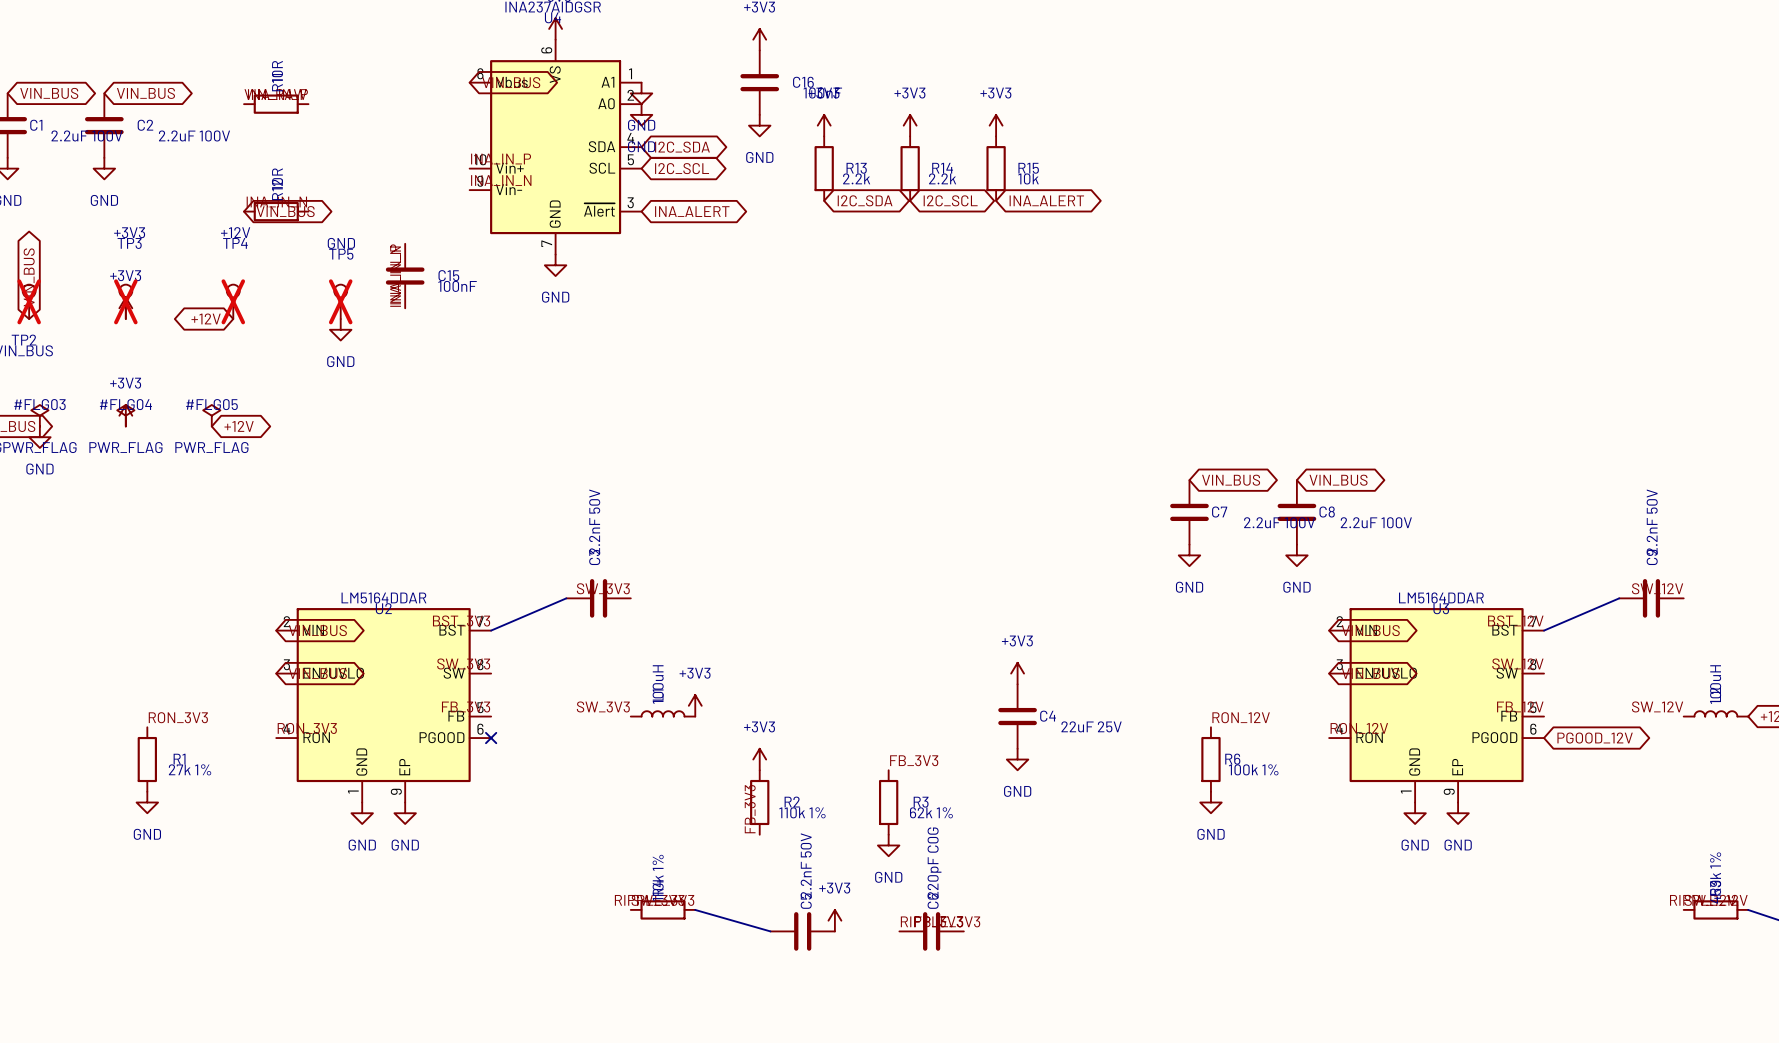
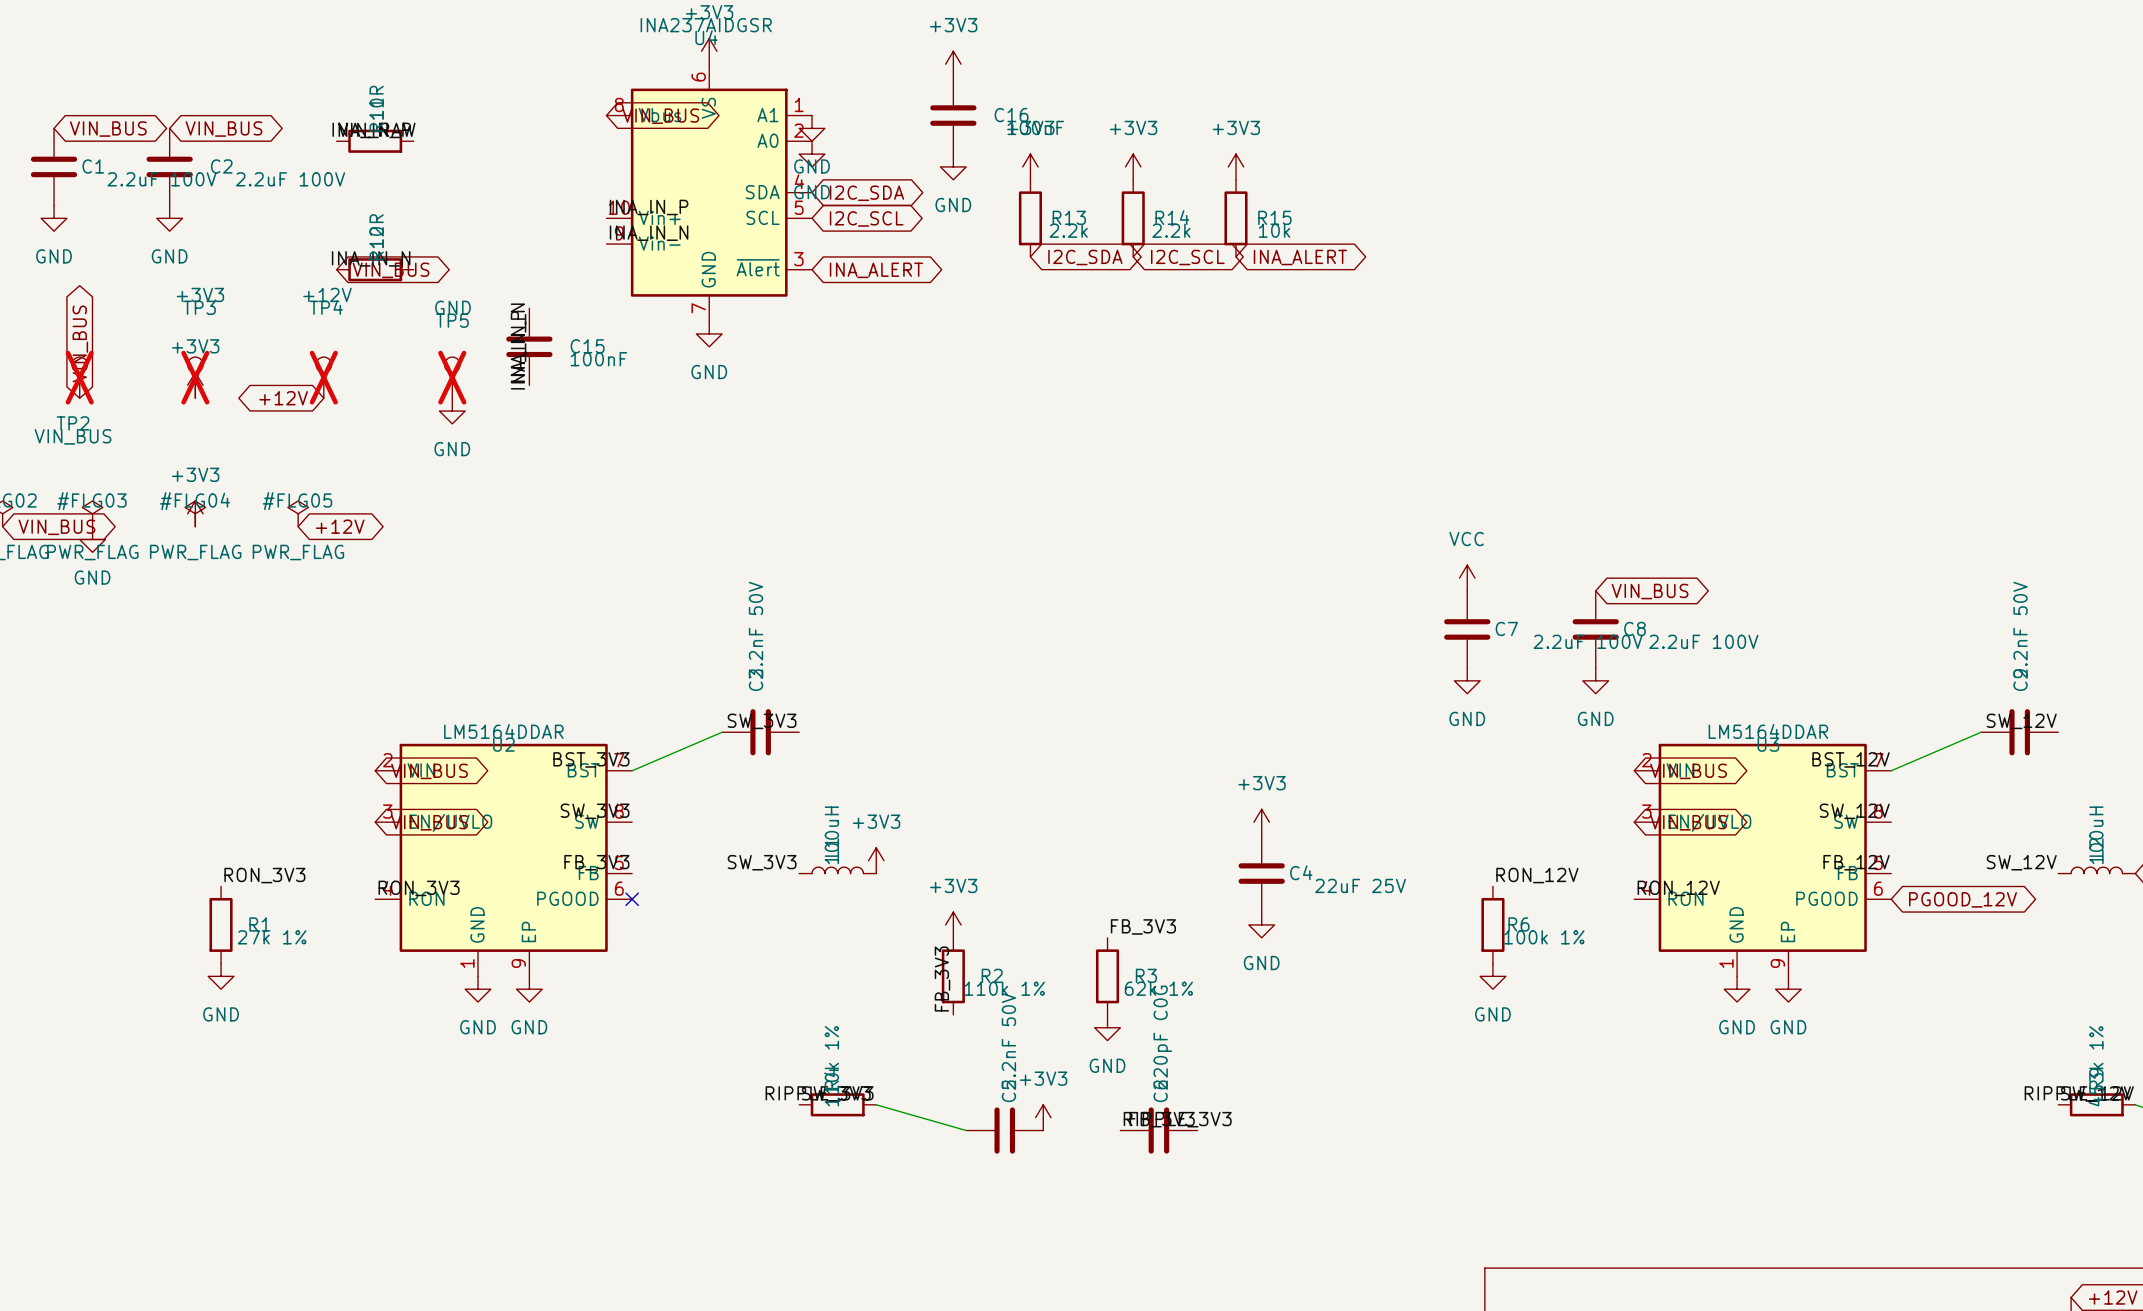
power symbol: none -> VCC (1467, 578)
global label: VIN_BUS (1231, 480) -> none

